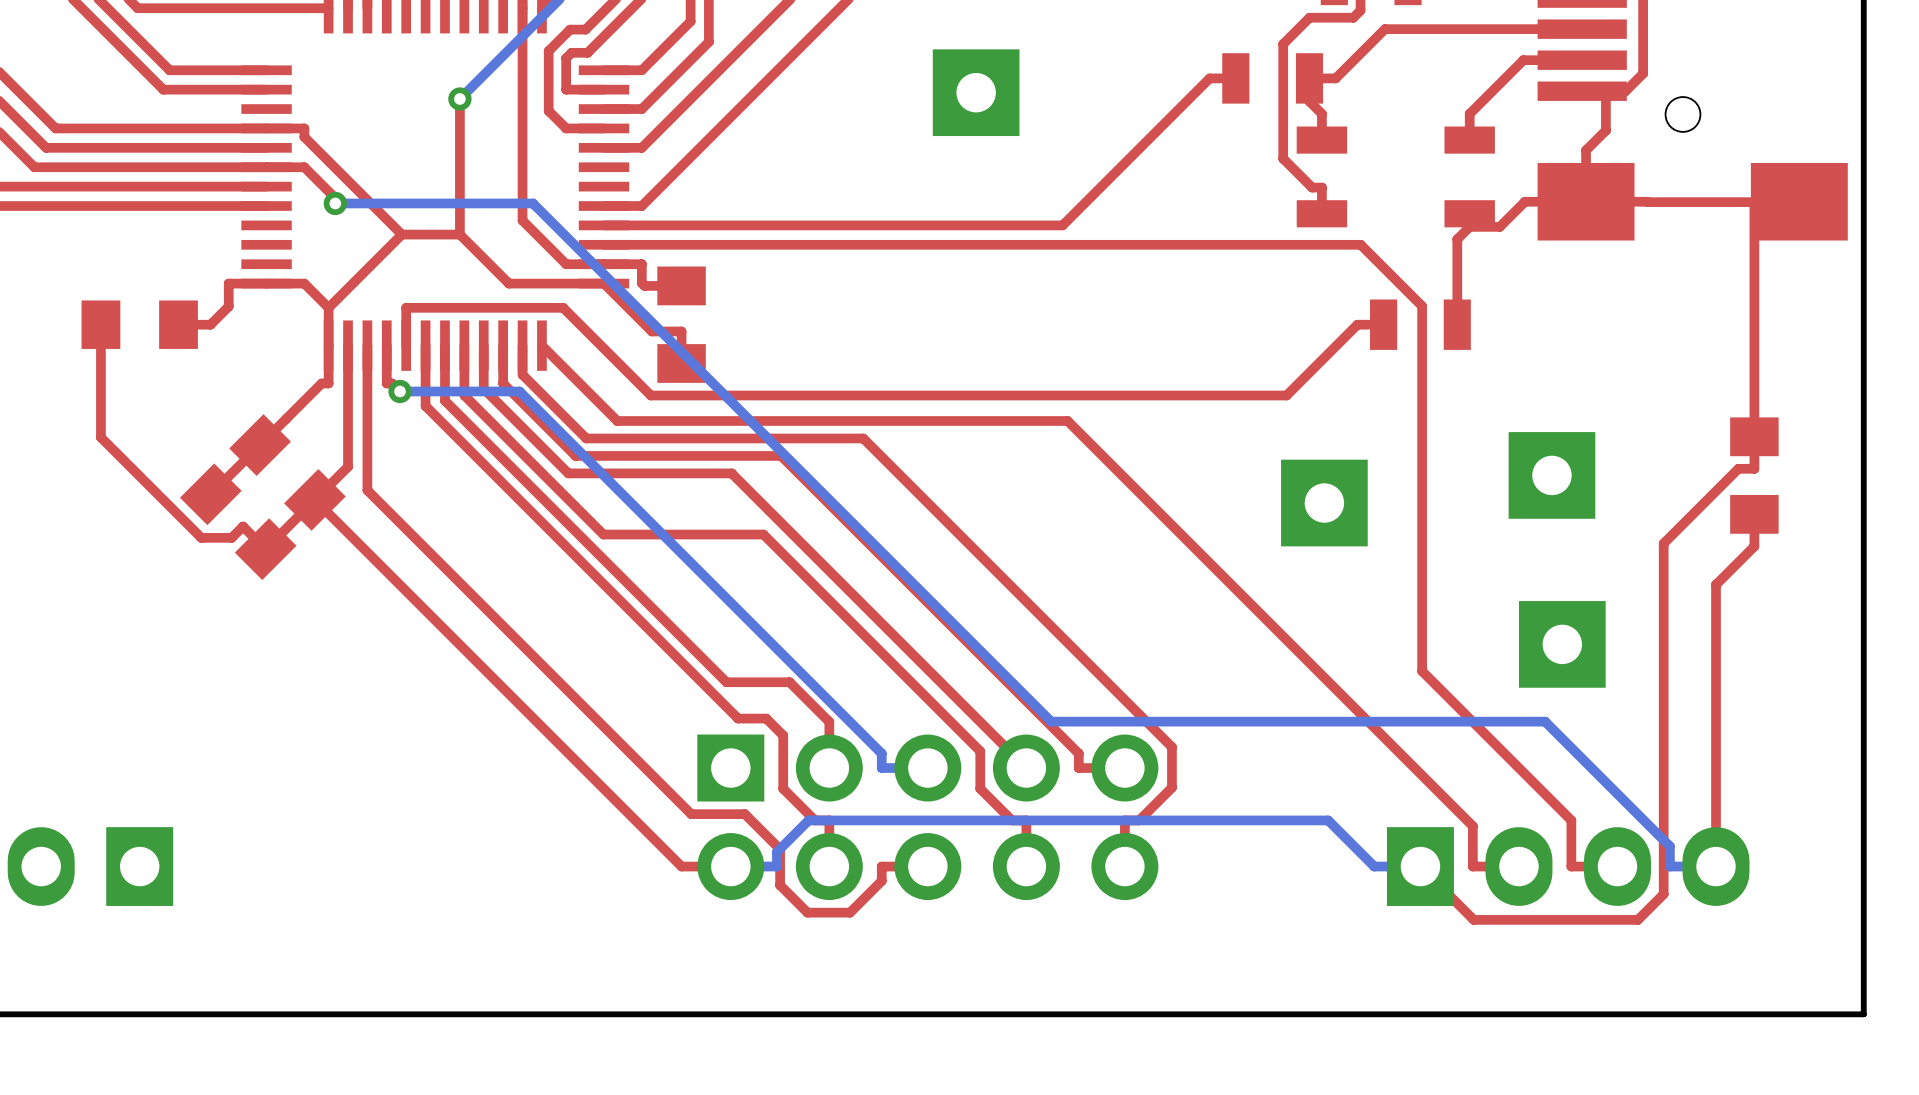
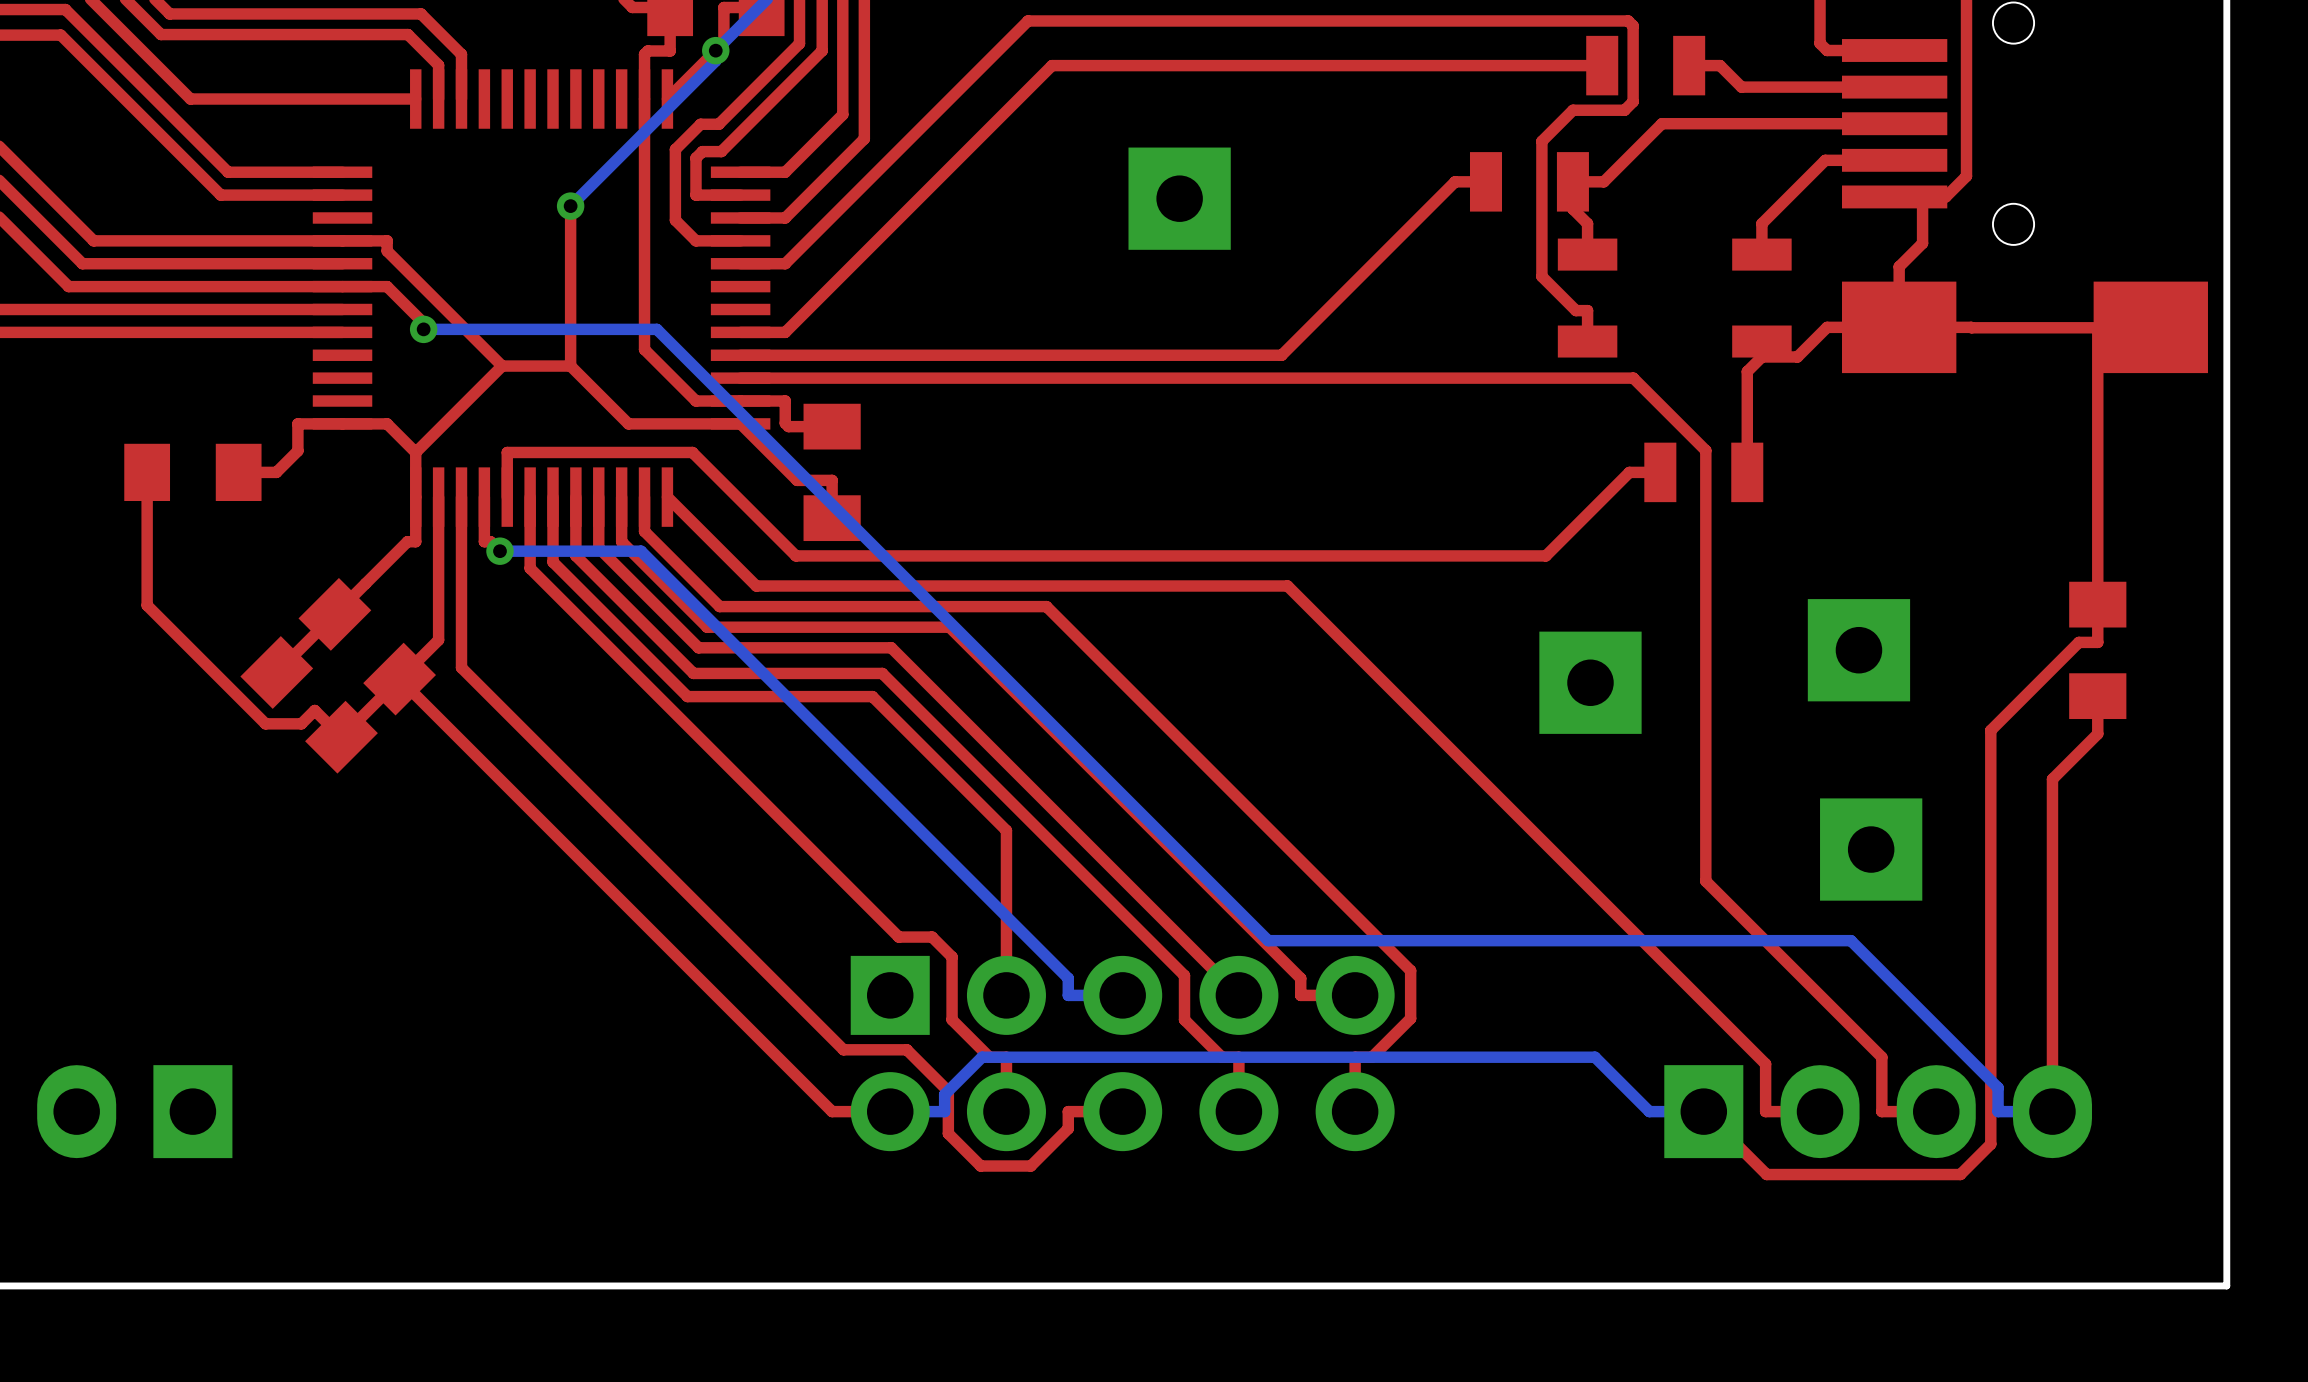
top track: (564, 495) (603, 534) (763, 534) -> (693, 673) (882, 673) (928, 719)
top track: (558, 514) (726, 682) (789, 682) (829, 721) -> (687, 696) (872, 696) (1006, 830) (1006, 940)

